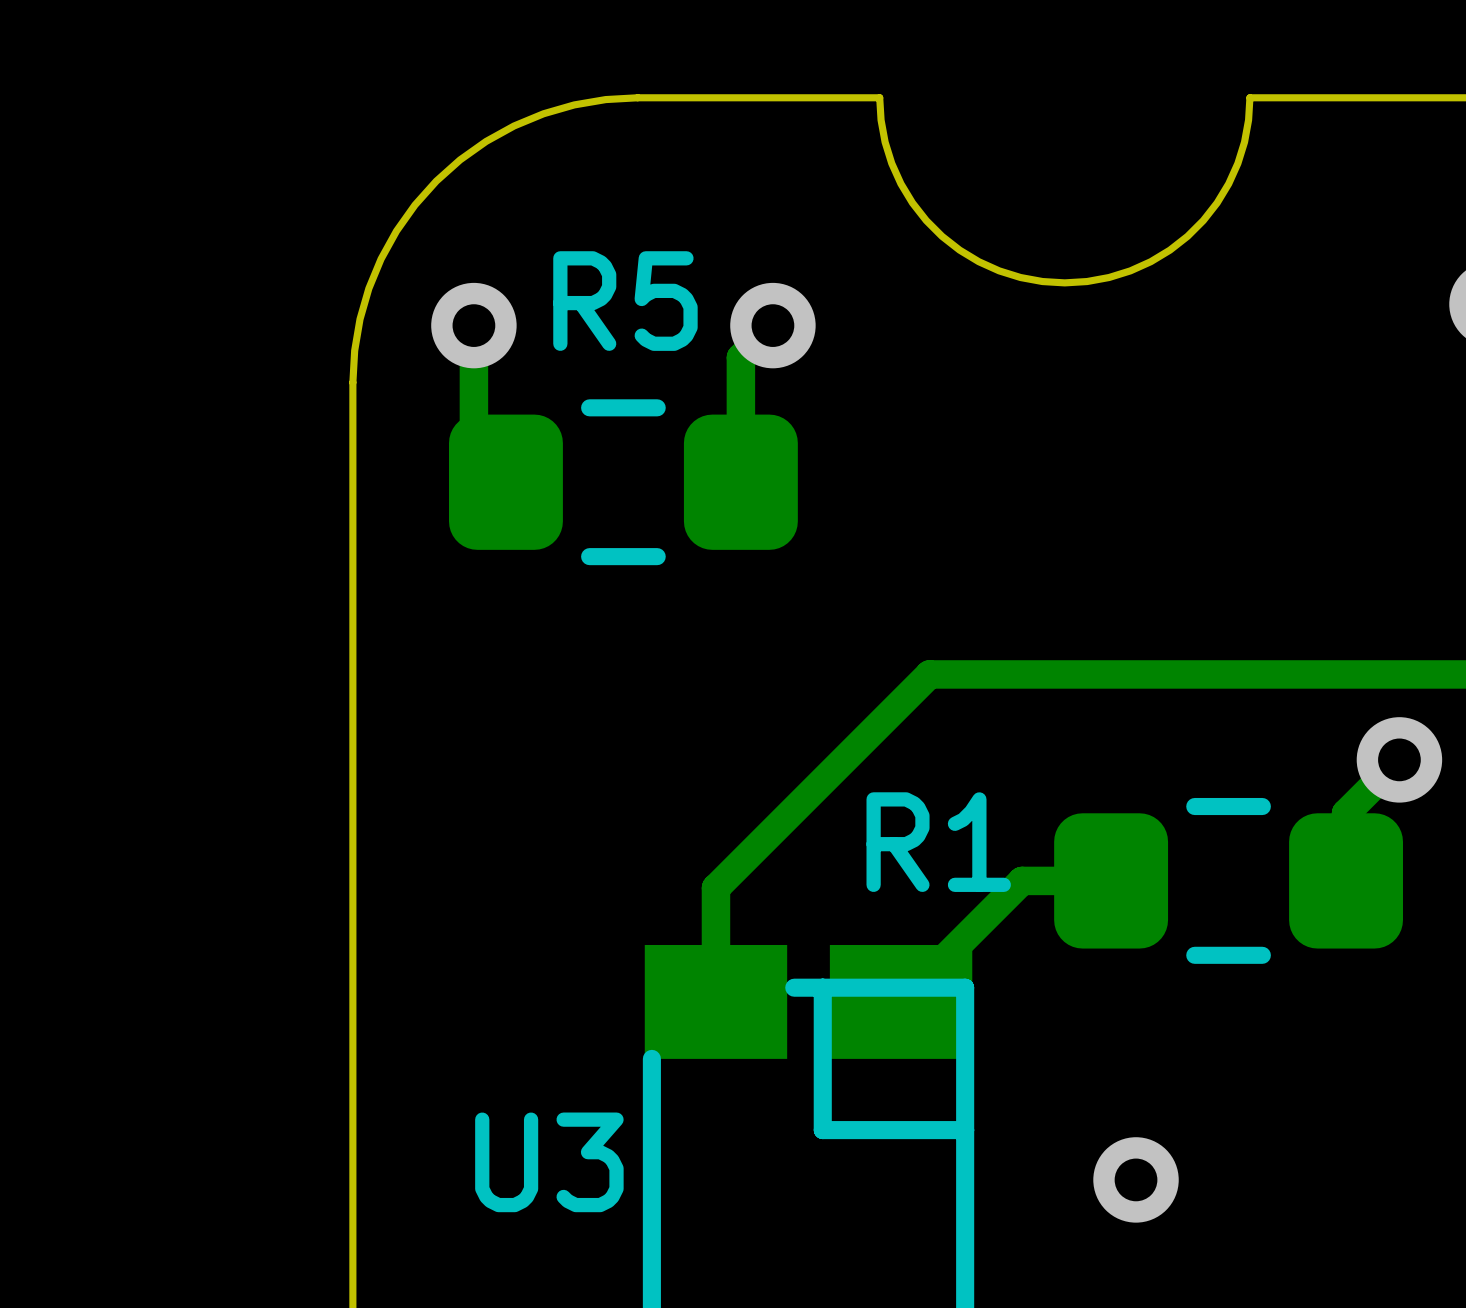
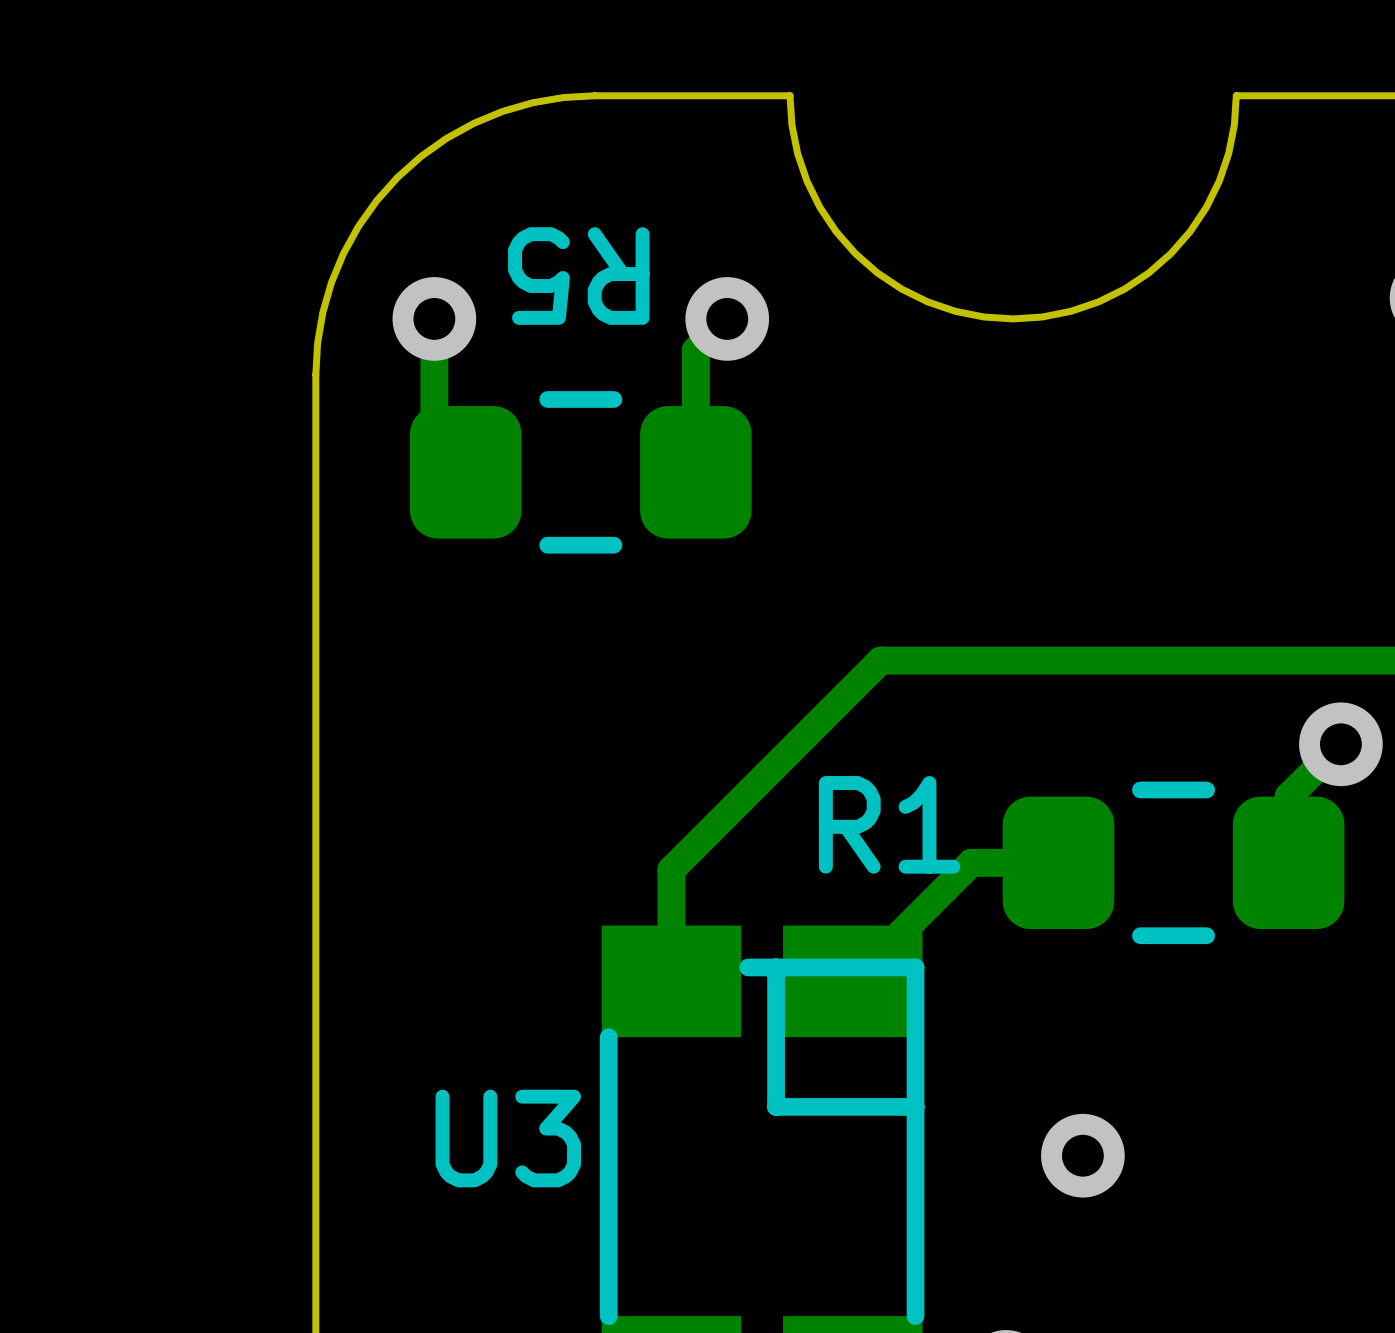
board edge: (1292, 97) (1249, 97) (1244, 142) (1228, 183) (1217, 202) (1187, 236) (1150, 261) (1130, 270) (1109, 277) (1064, 282) (1020, 277) (999, 270) (978, 261) (942, 236) (912, 202) (891, 163) (881, 120) (879, 97) (837, 97) -> (1236, 95) (1234, 124) (1228, 153) (1219, 181) (1206, 207) (1190, 231) (1170, 253) (1149, 272) (1124, 289) (1098, 301) (1070, 311) (1042, 317) (1013, 318) (984, 317) (955, 311) (927, 301) (901, 289) (877, 272) (855, 253) (836, 231) (819, 207) (806, 181) (797, 153) (791, 124) (790, 95)
R5 name rotation: 0° (625, 301) -> 180° (578, 276)

